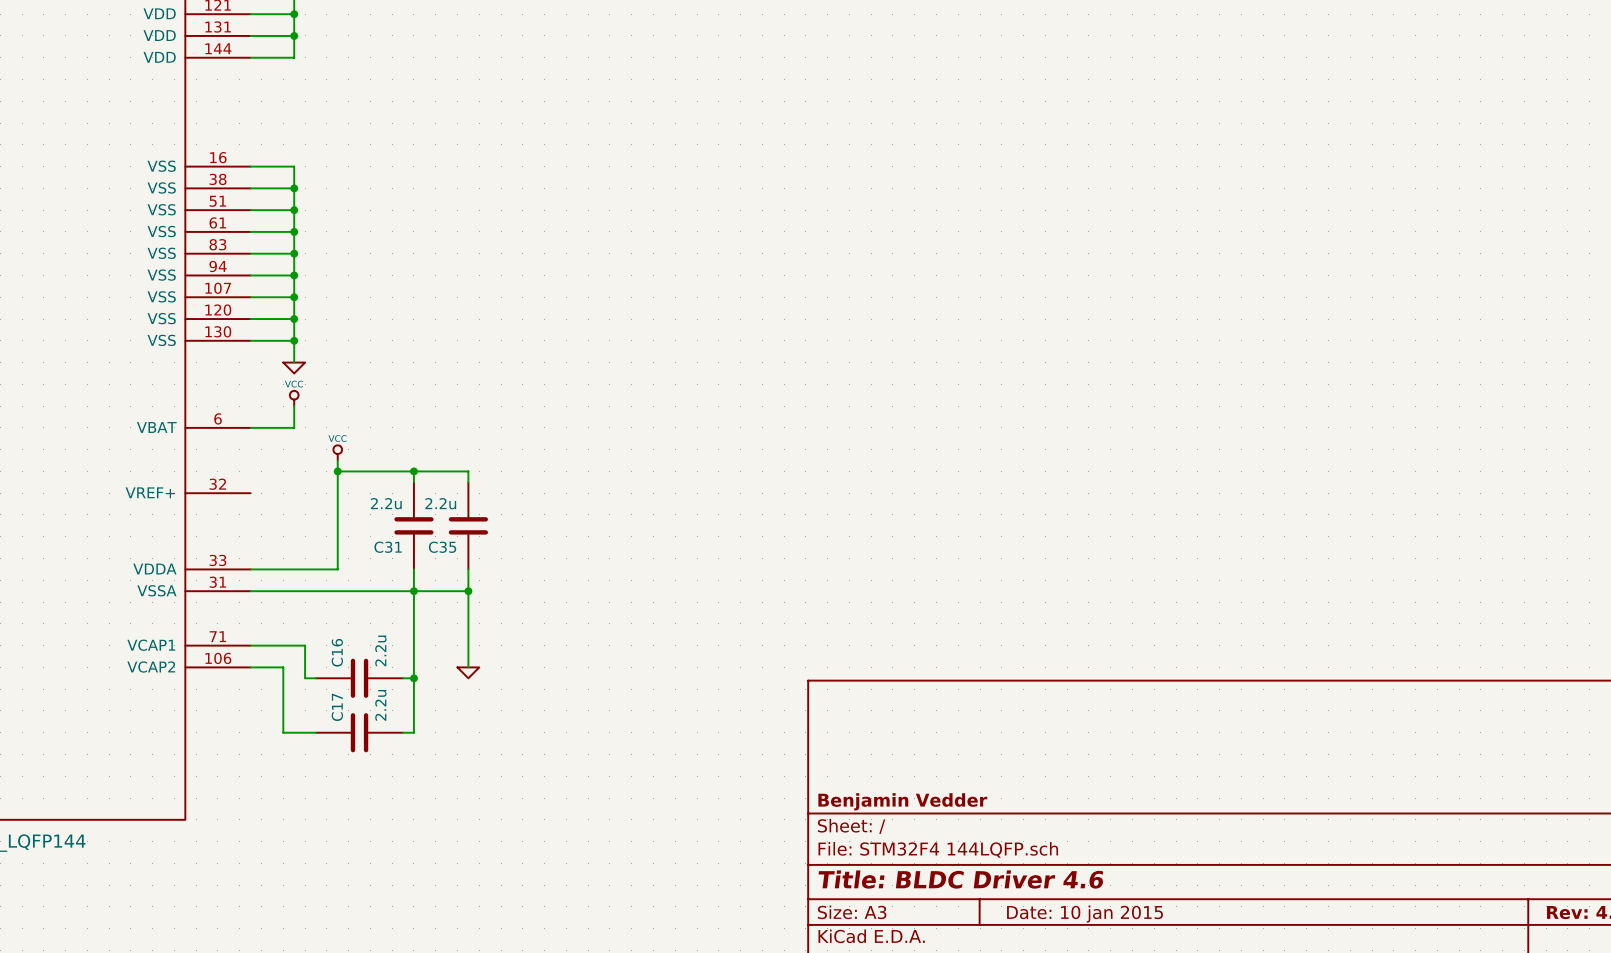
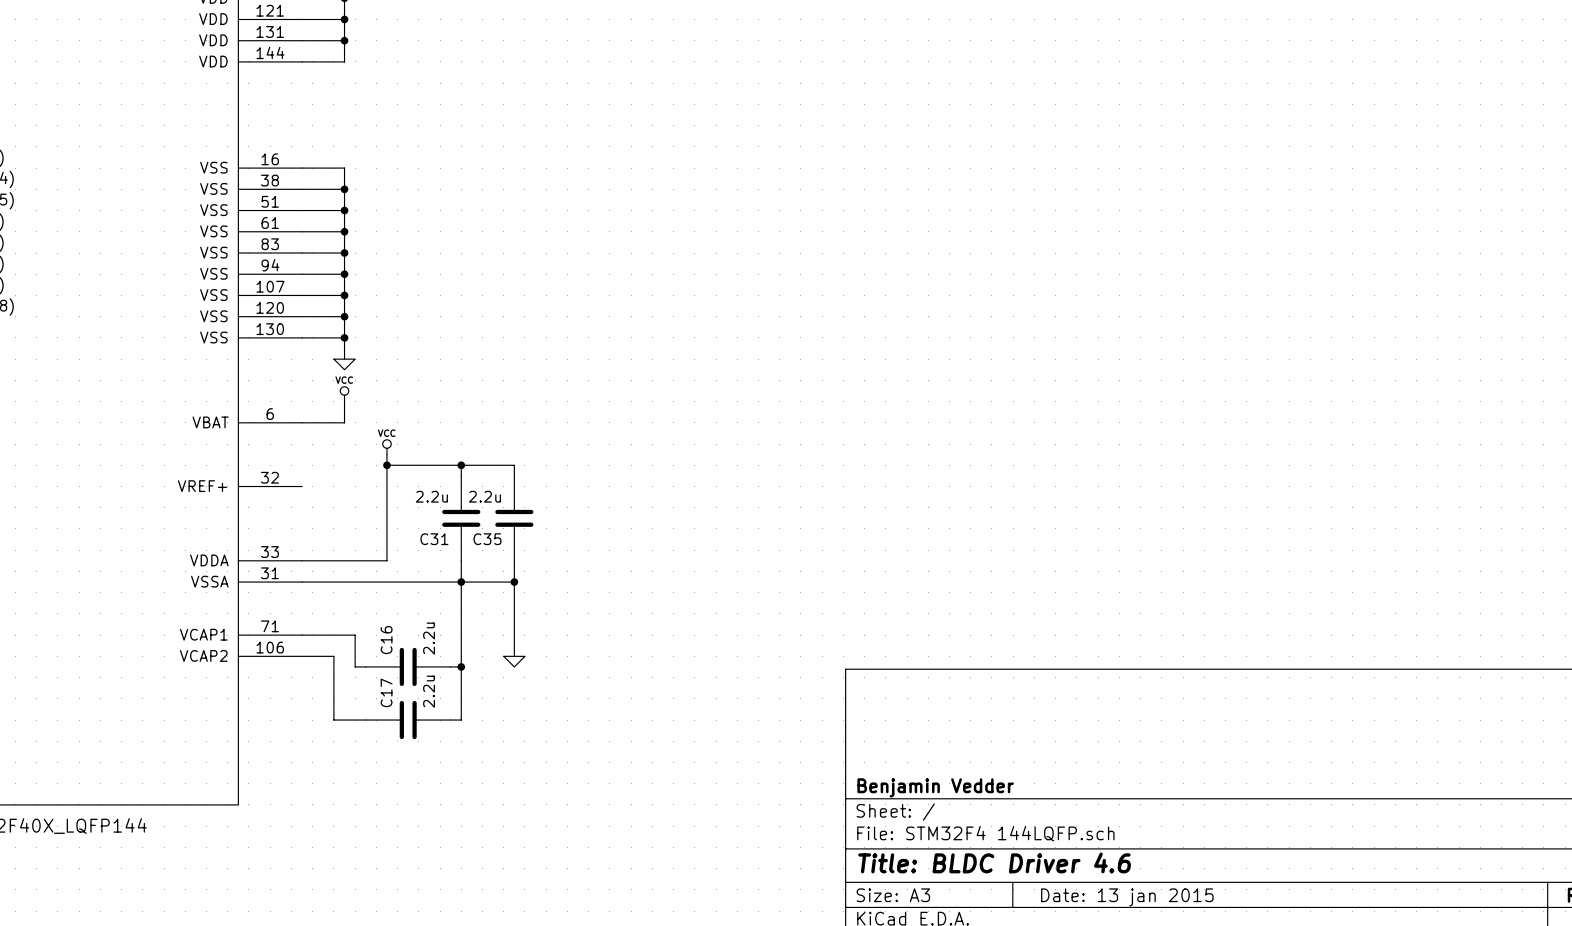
title block: Date: 10 jan 2015 (1085, 914) -> Date: 13 jan 2015 (1127, 897)

